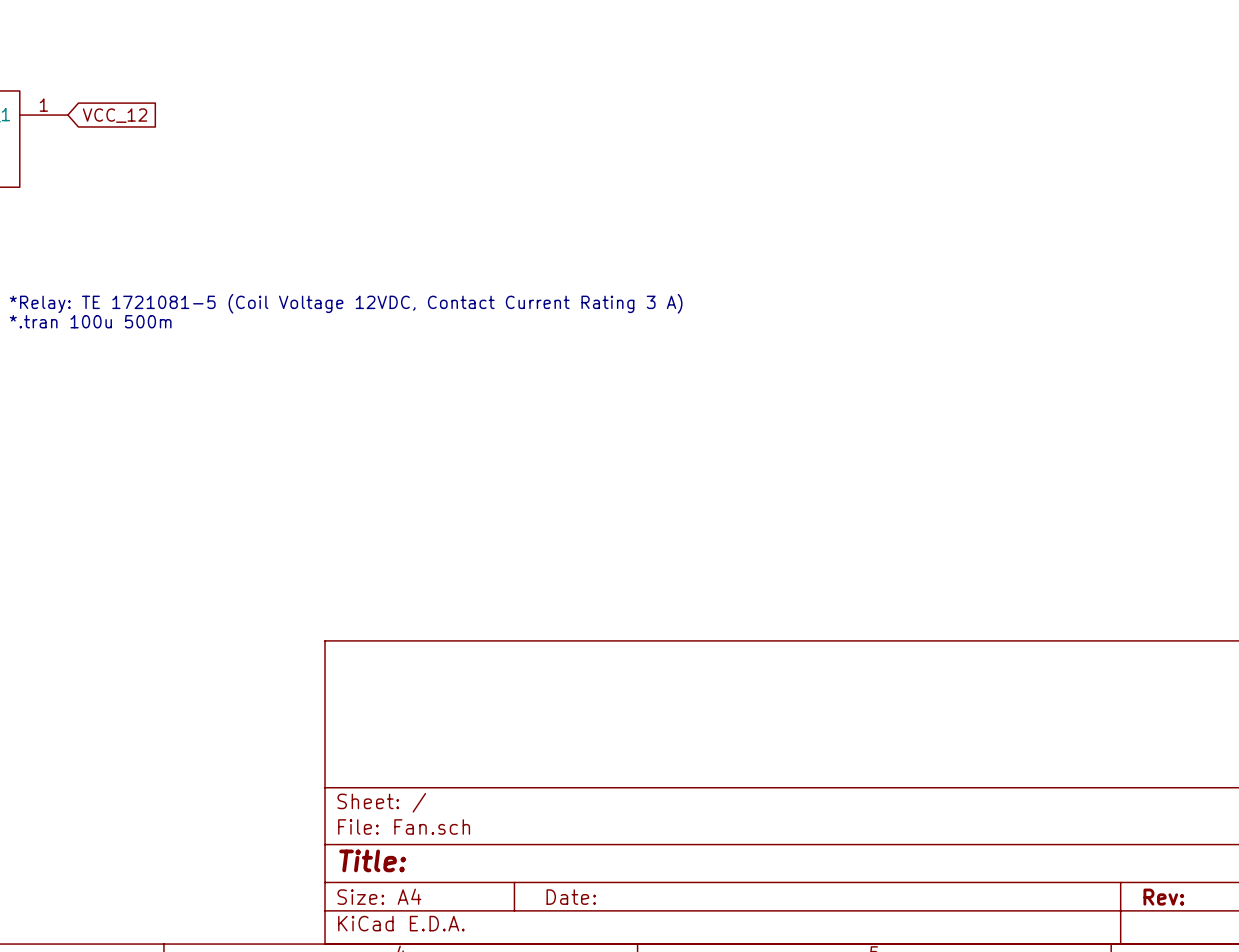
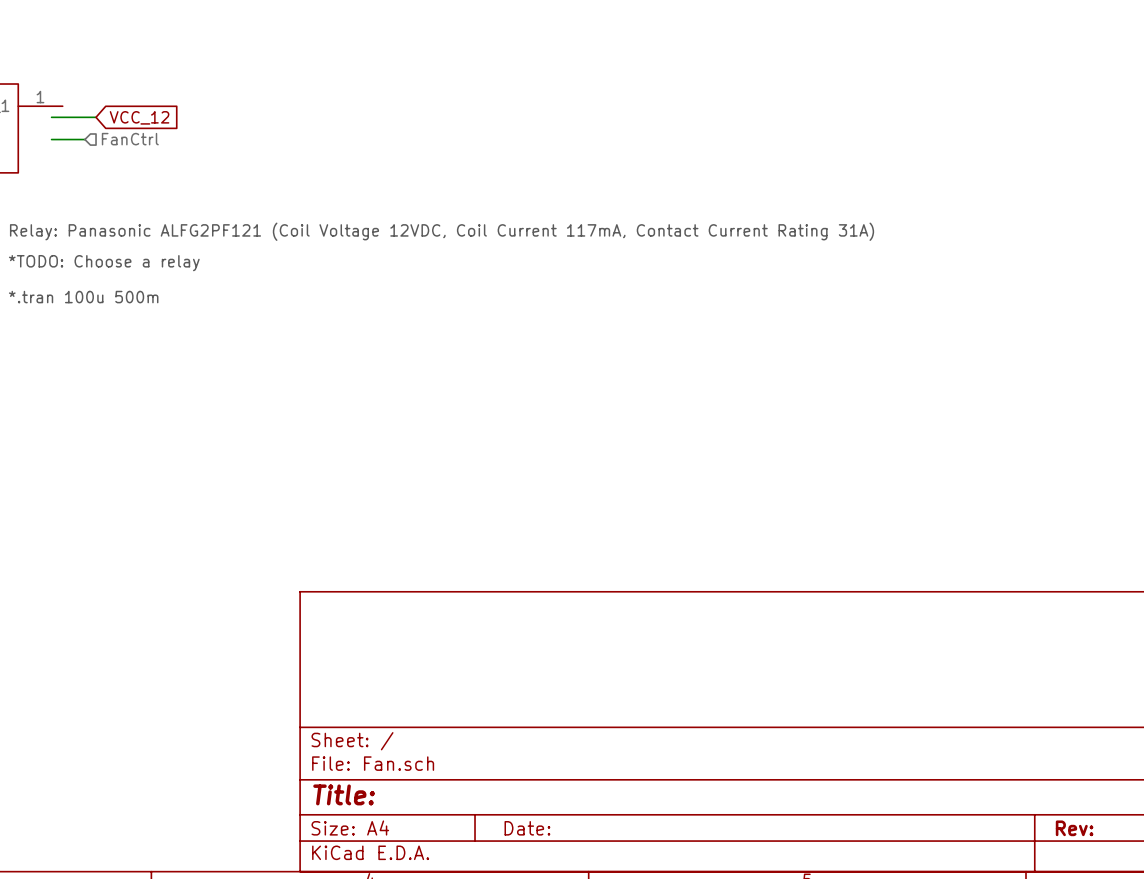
global label position: VCC_12 (115, 115) -> VCC_12 (139, 117)
wire: none -> (51, 117) (96, 117)
hierarchical label: none -> FanCtrl (130, 139)
wire: none -> (51, 139) (84, 139)
text: none -> Relay: Panasonic ALFG2PF121 (Coil Voltage 12VDC, Coil Current 117mA, Contact Current Rating 31A) (442, 231)
text: none -> *TODO: Choose a relay (104, 263)
text: *Relay: TE 1721081-5 (Coil Voltage 12VDC, Contact Current Rating 3 A) (346, 303) -> none

